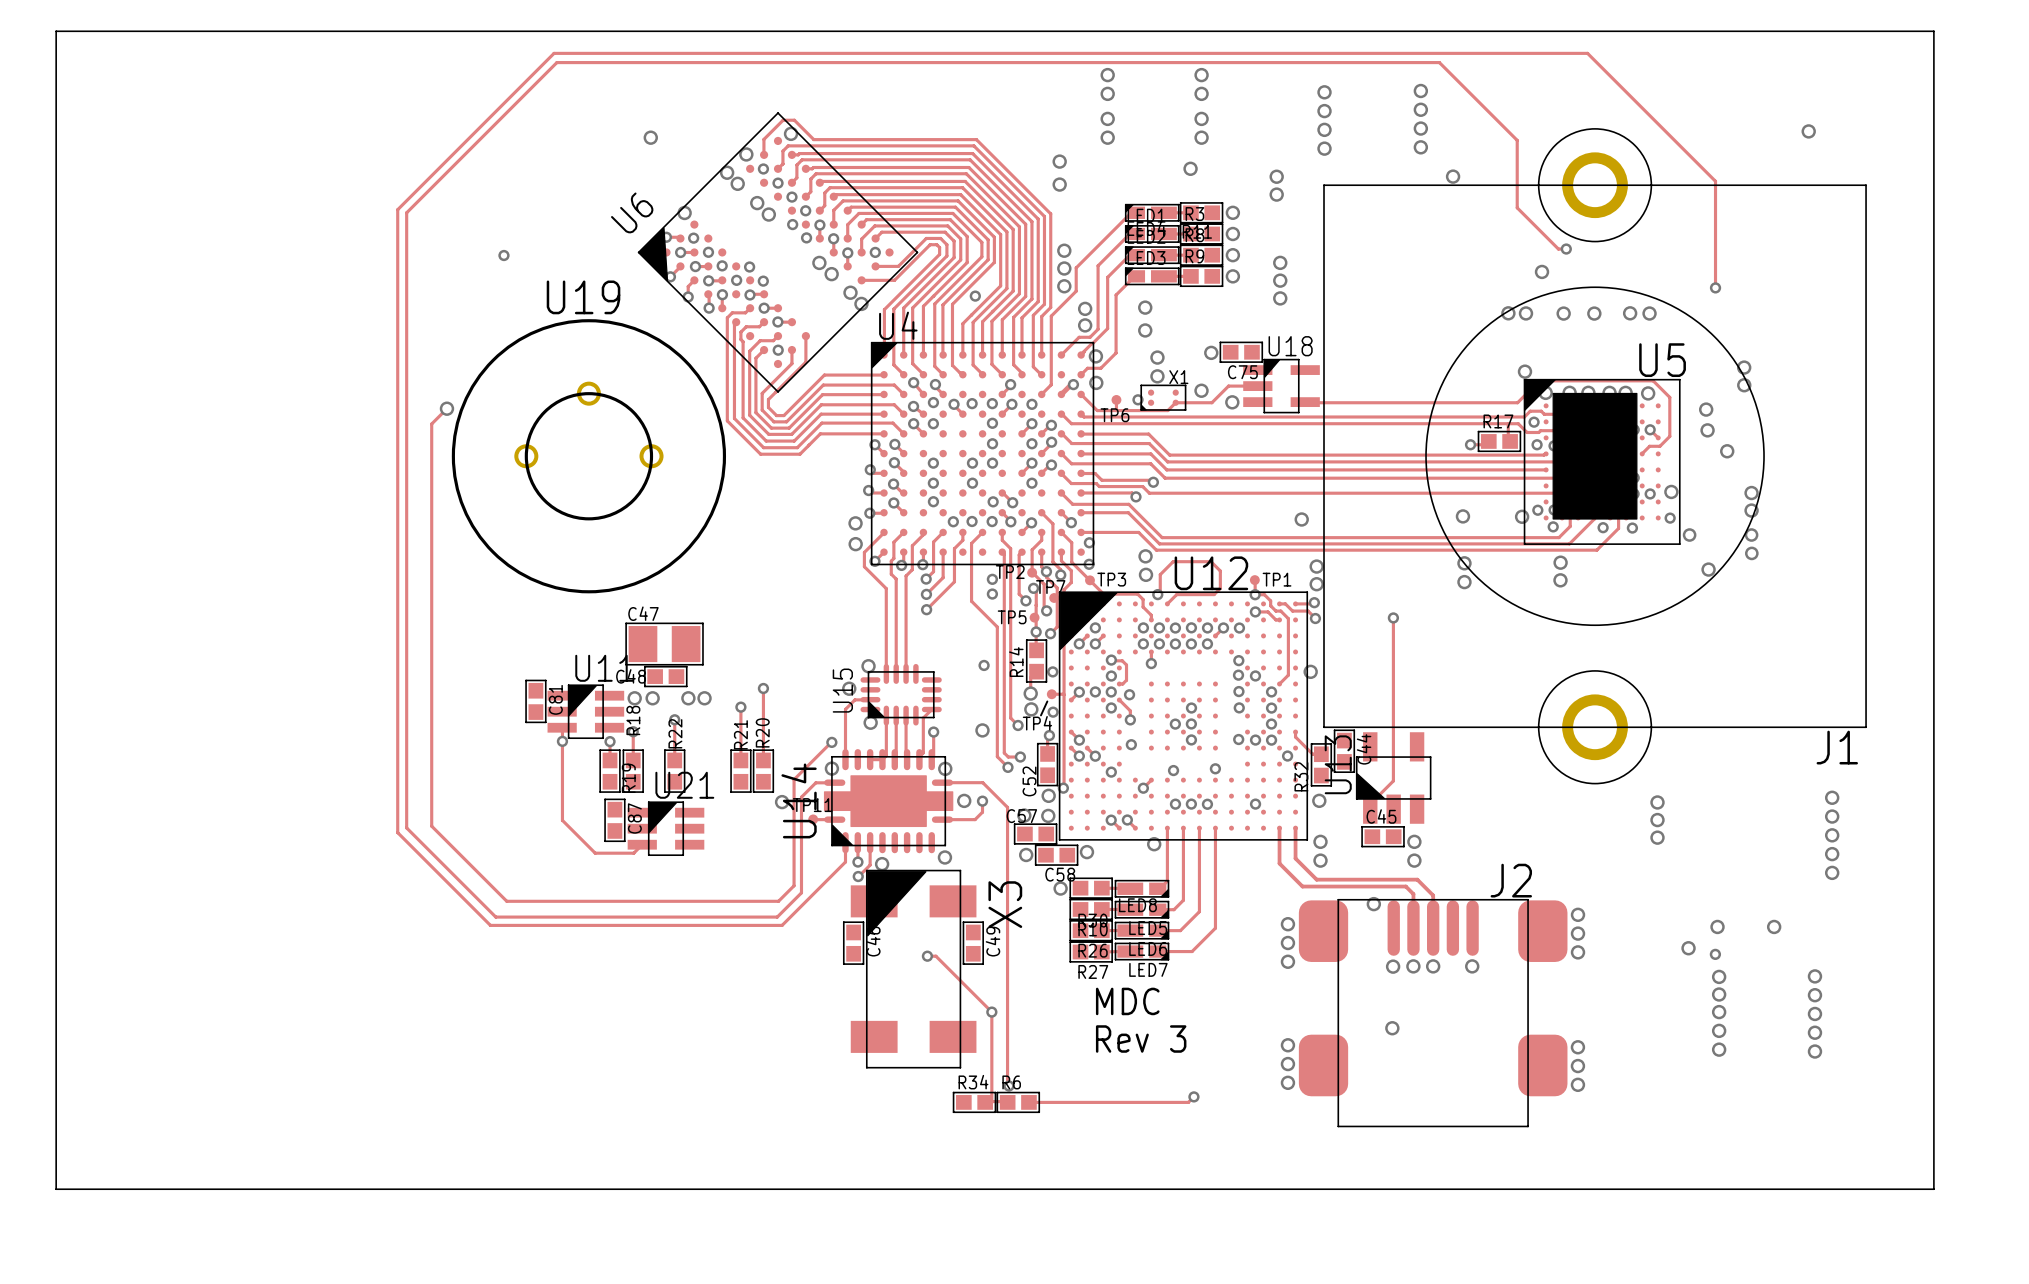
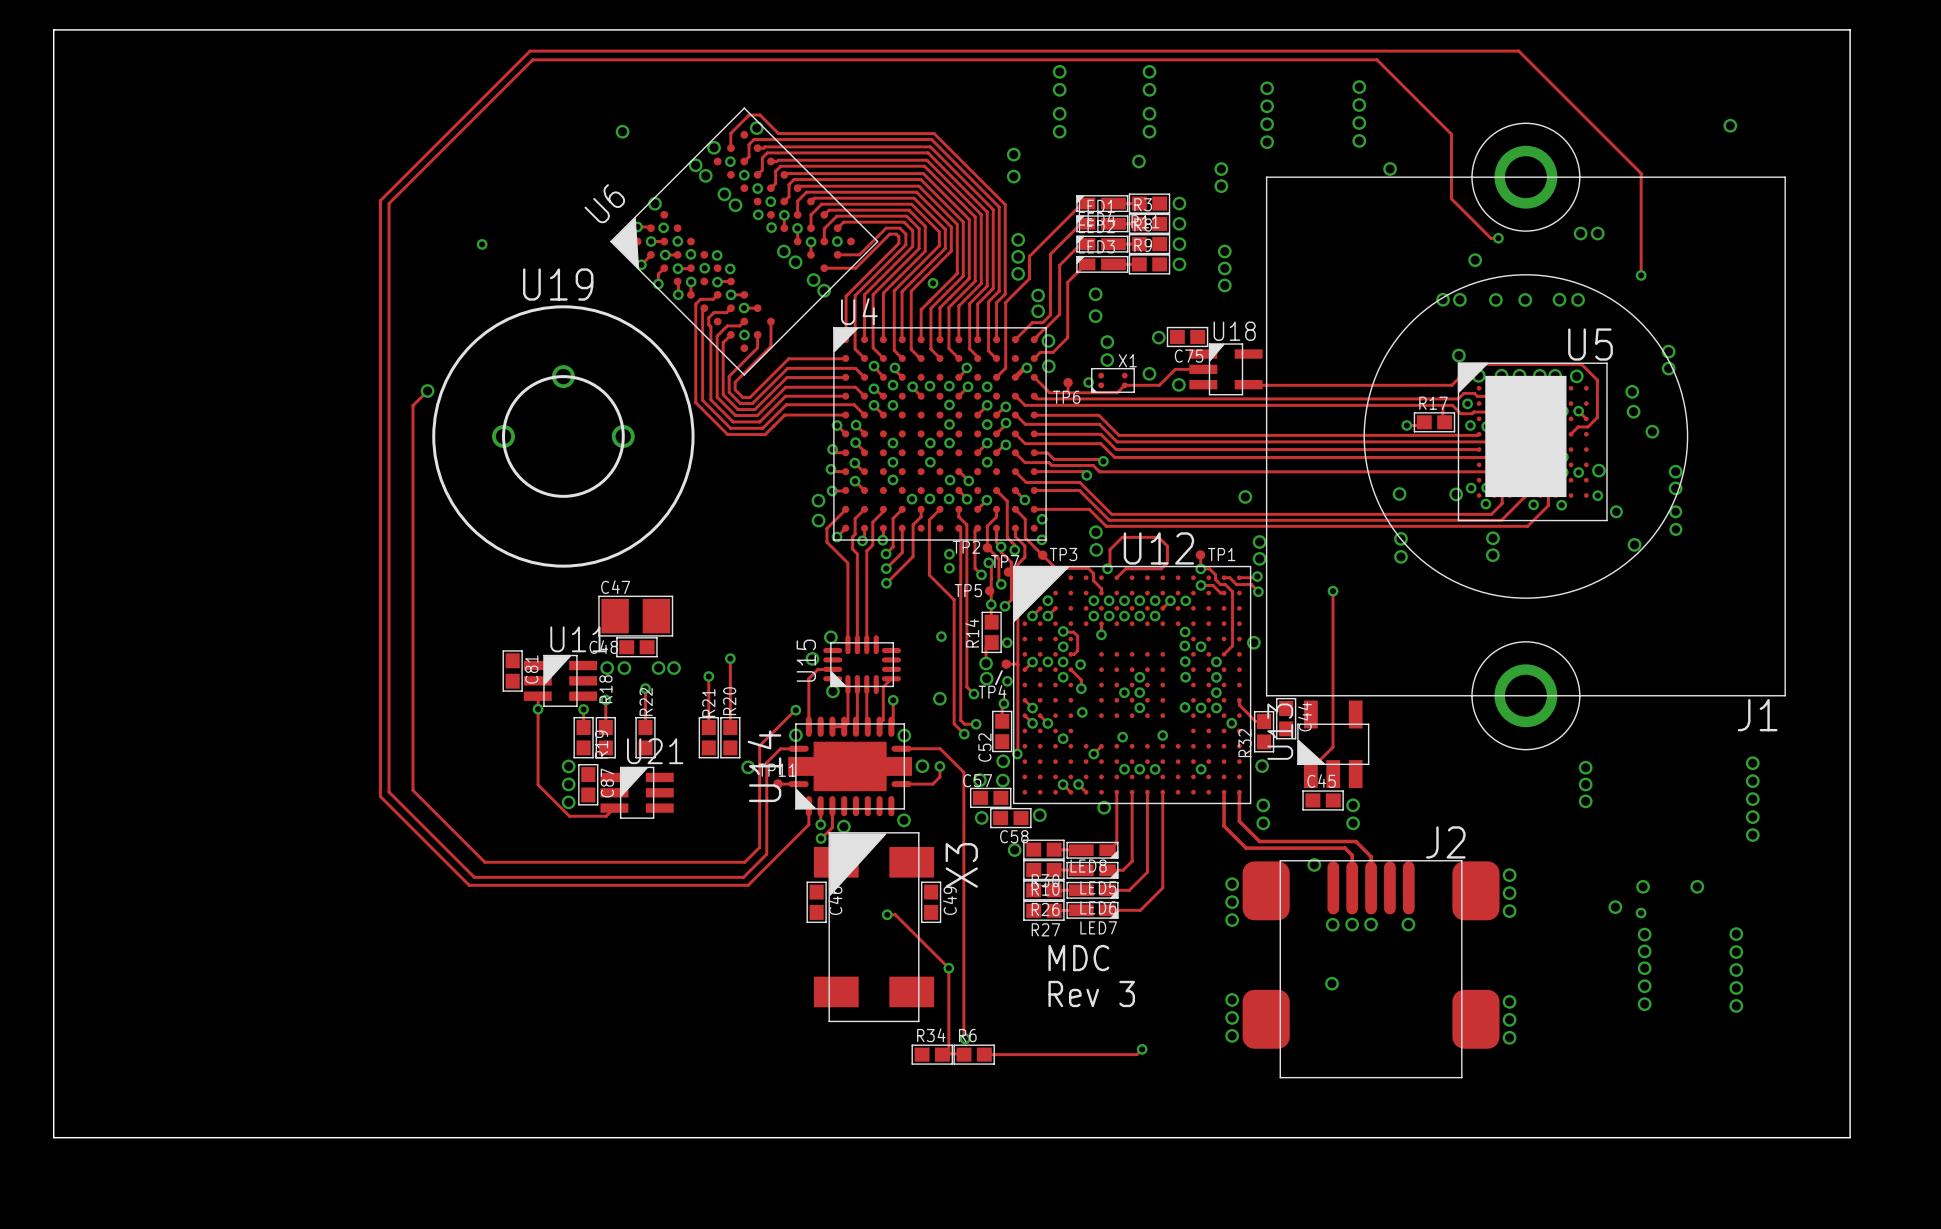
via: none -> (1580, 233)
via: none -> (1597, 233)
via: none -> (568, 766)
via: none -> (568, 784)
via: none -> (568, 802)

